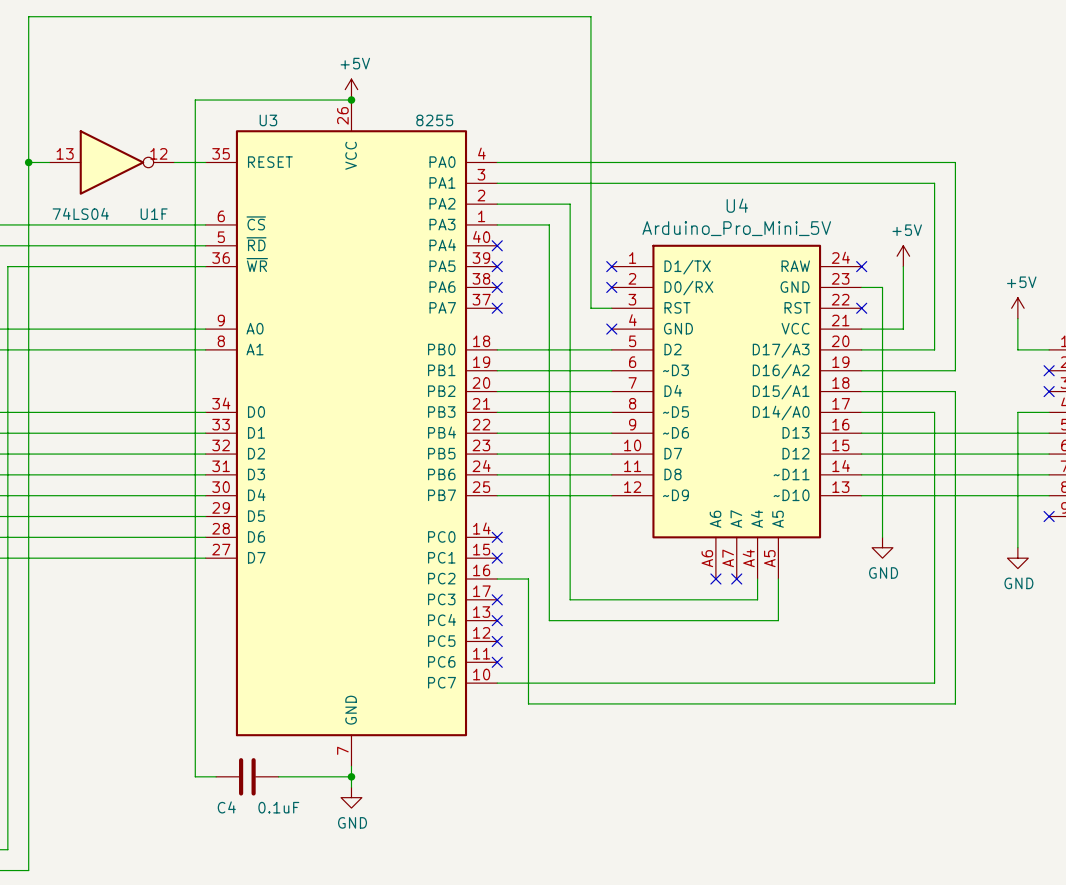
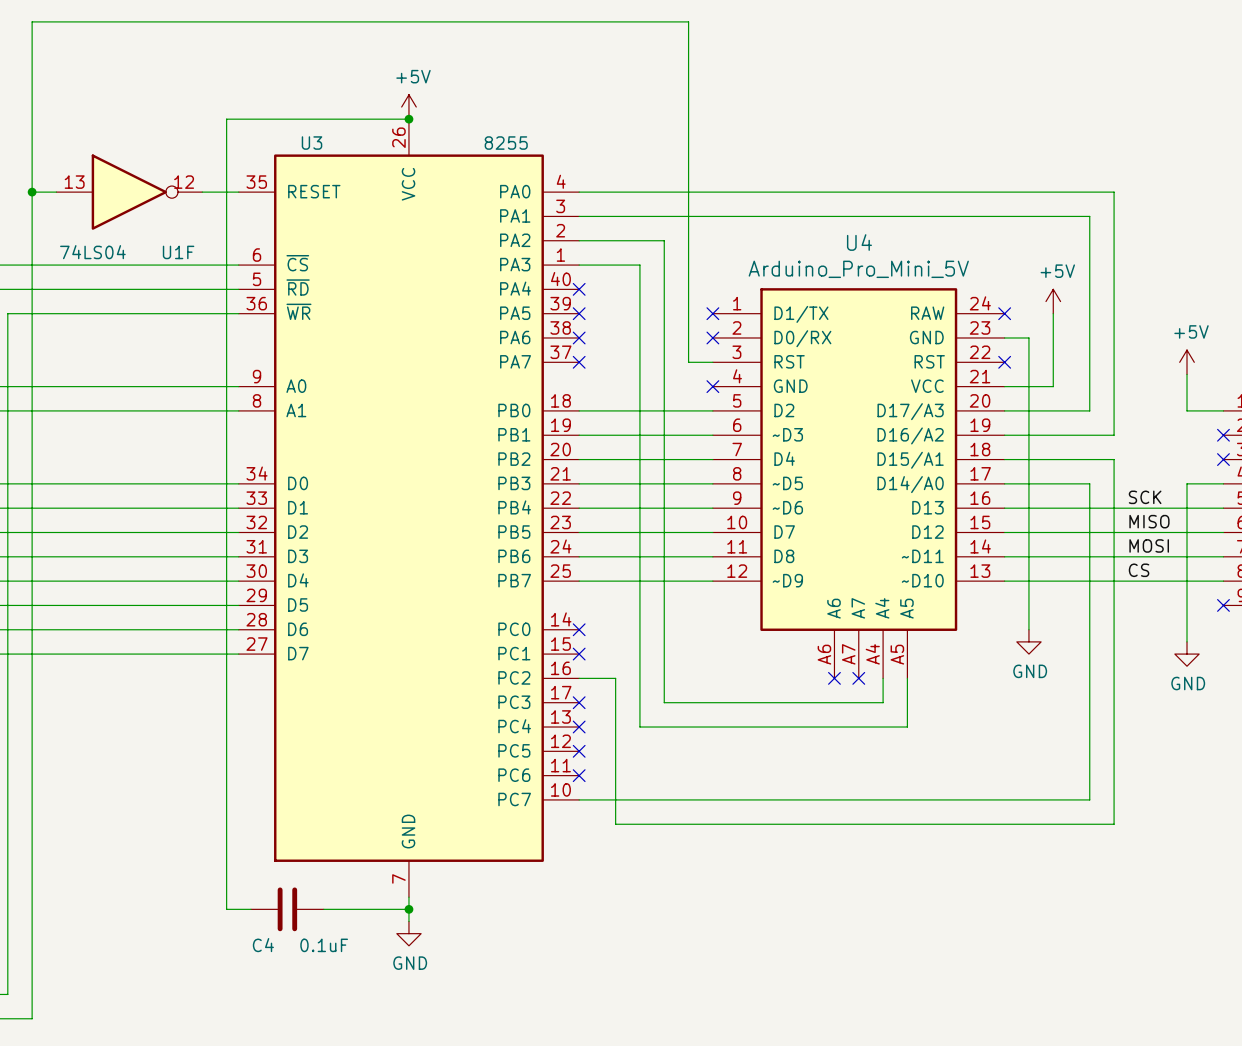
label: none -> SCK (1145, 497)
label: none -> MISO (1149, 521)
label: none -> MOSI (1149, 545)
label: none -> CS (1139, 570)

